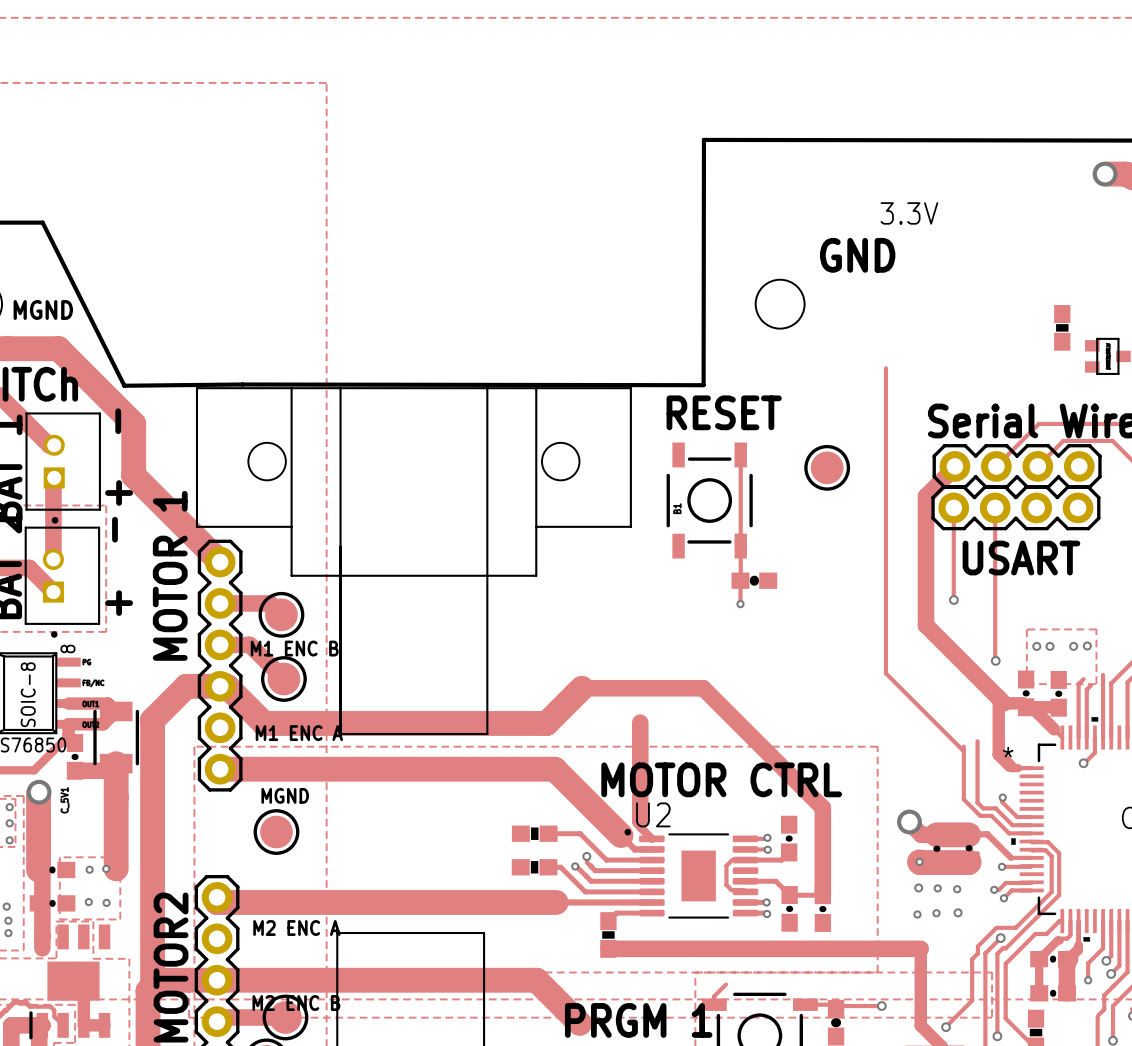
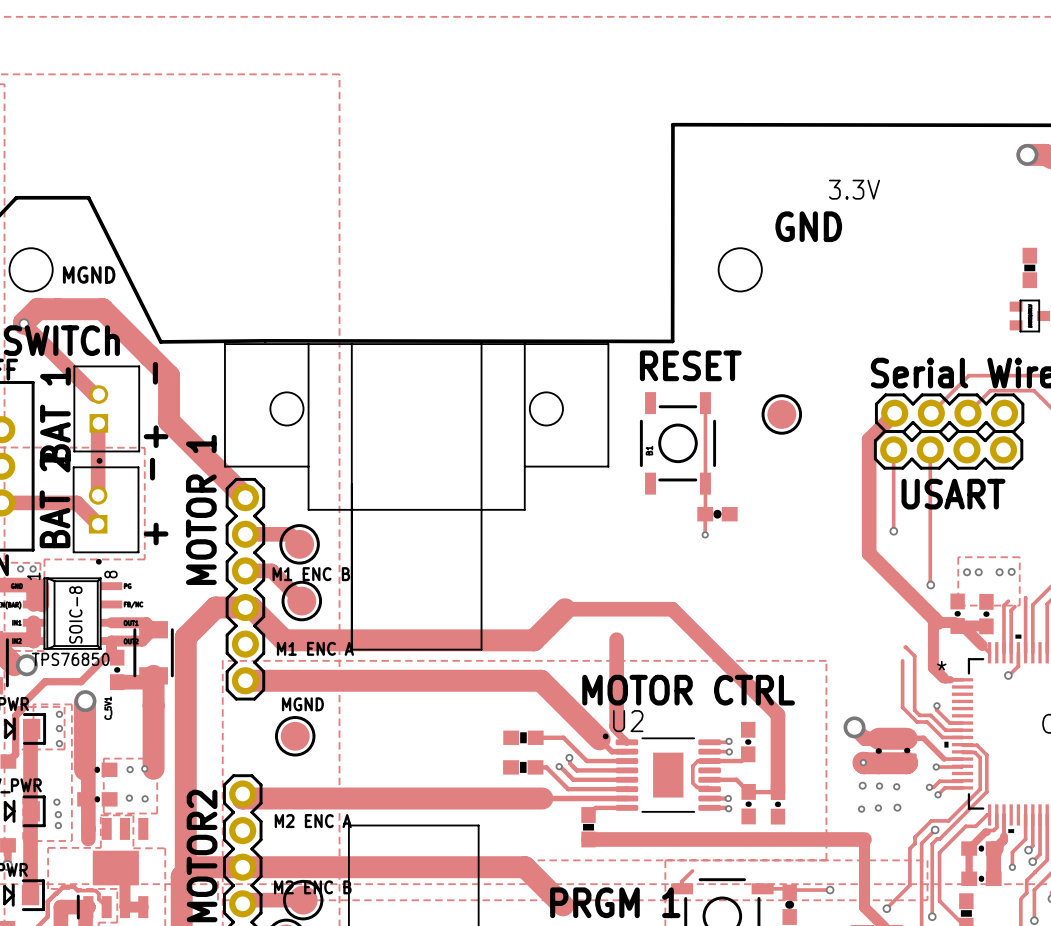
part position: (1062, 327) -> (1029, 267)
track: (885, 368) (885, 673) (963, 751) -> none
track: none -> (905, 647) (914, 656)

